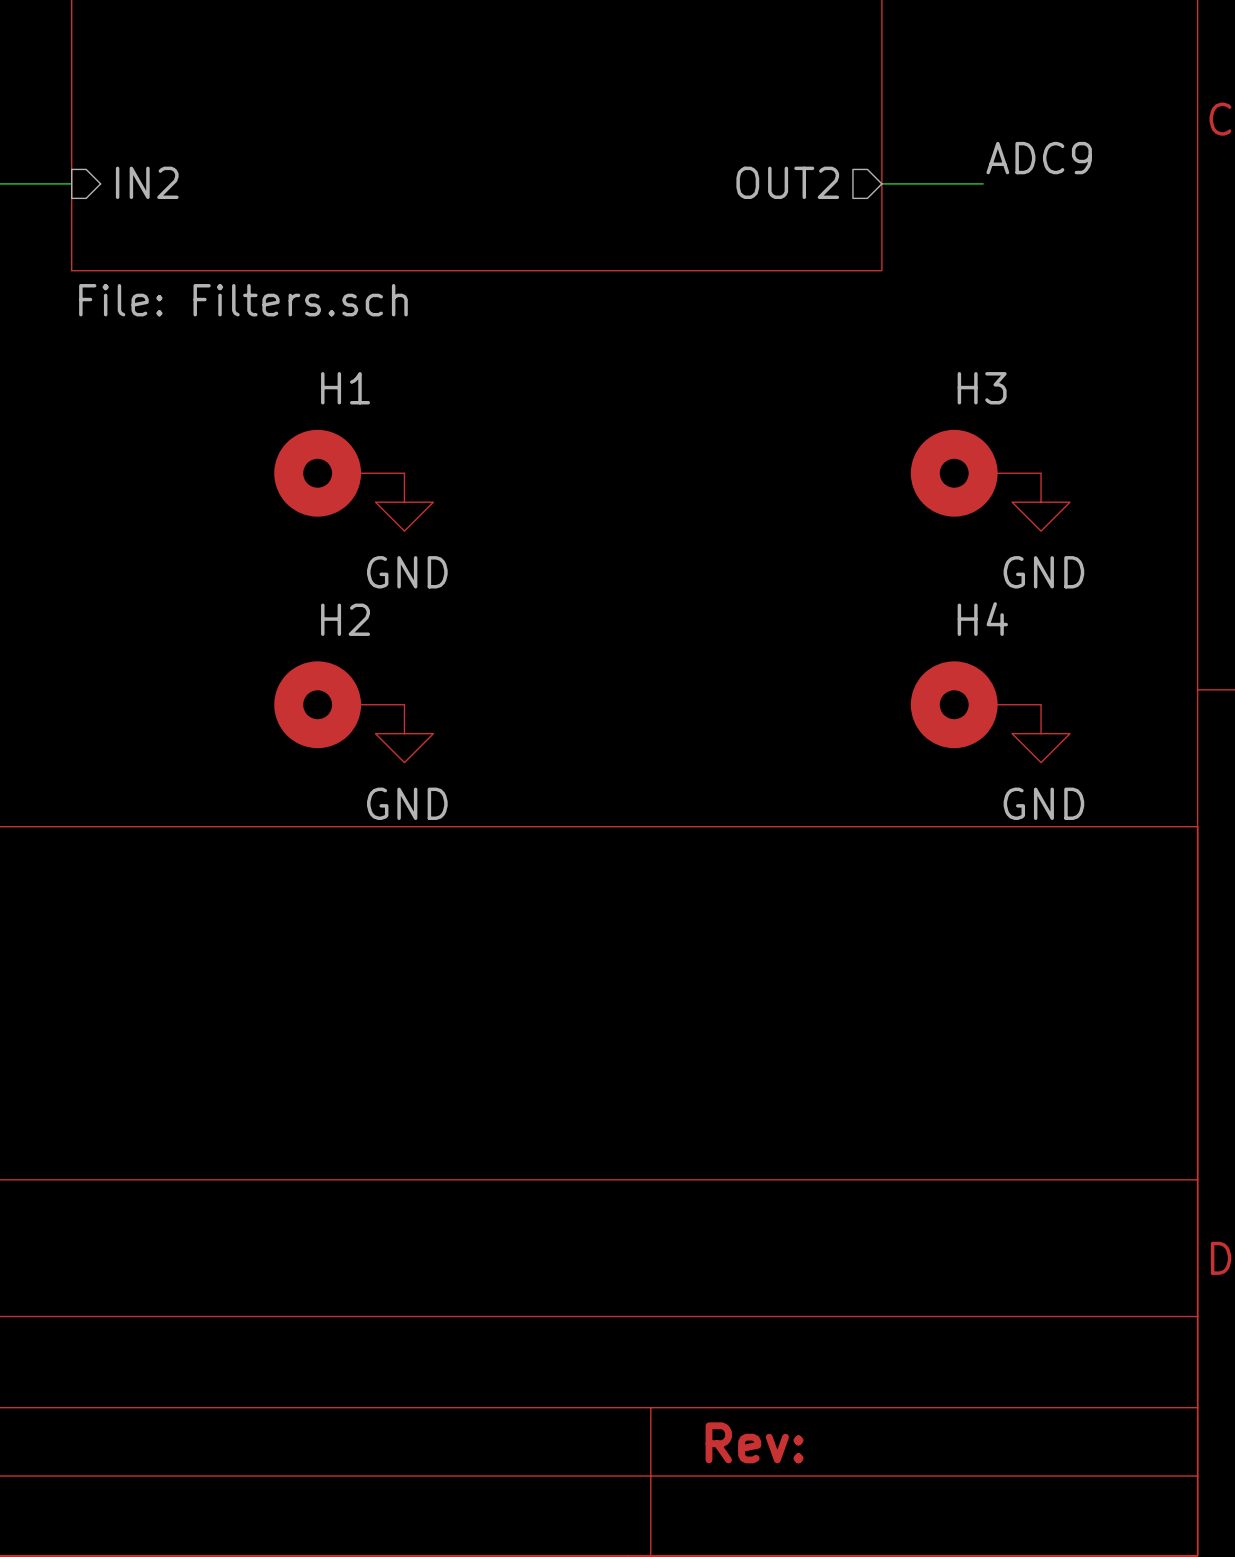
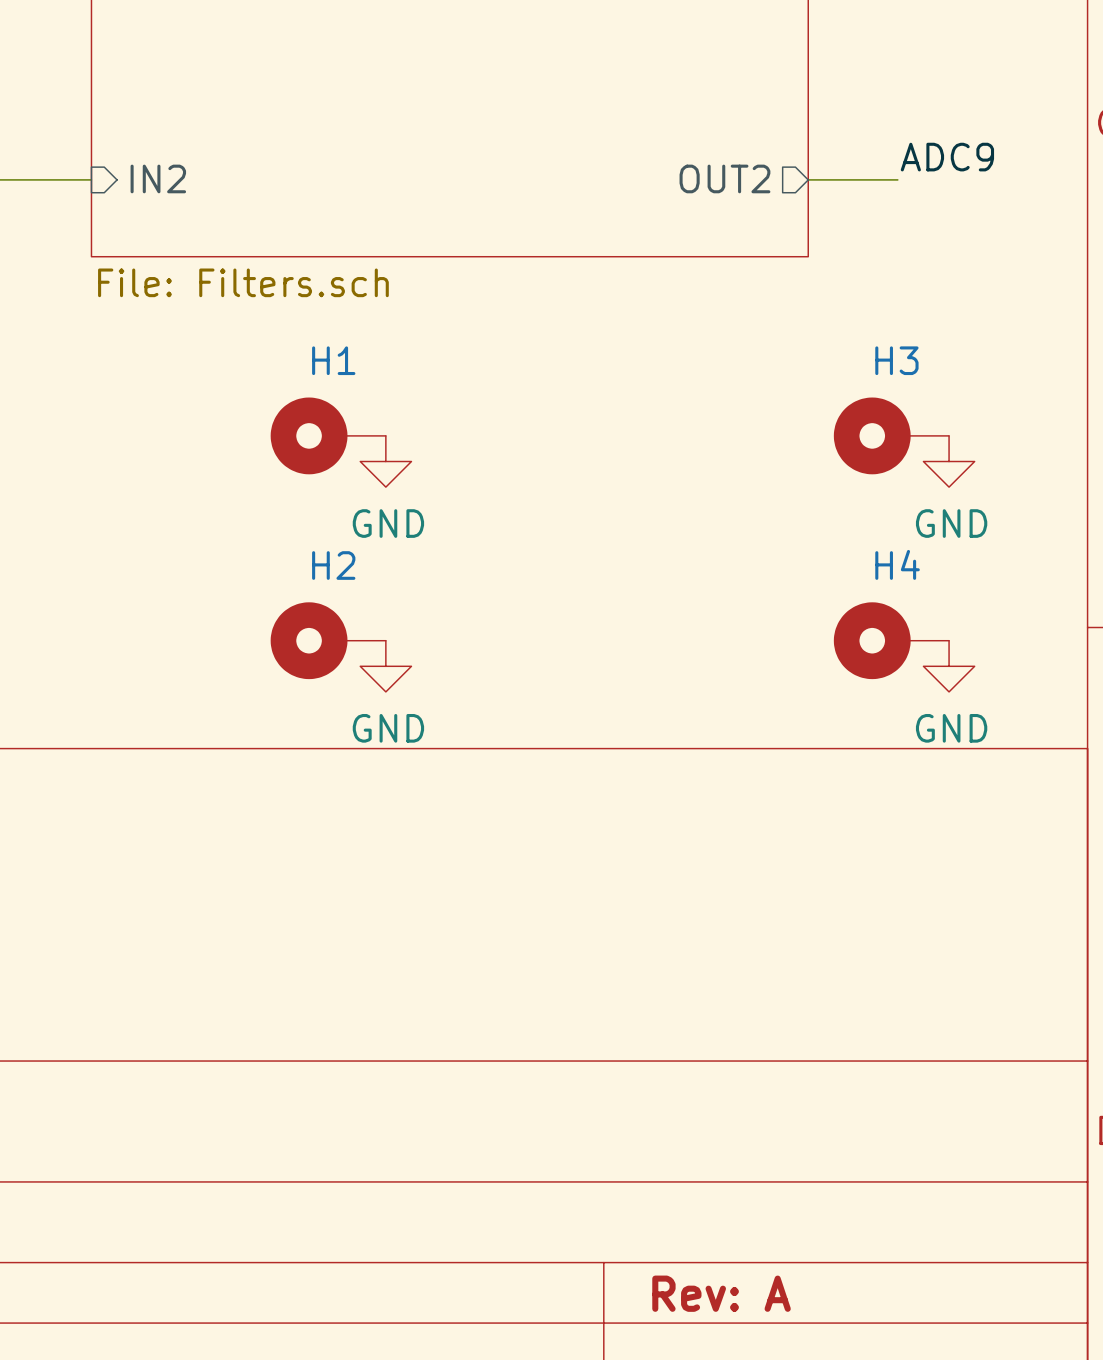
title block: Rev: (754, 1442) -> Rev: A (721, 1293)

